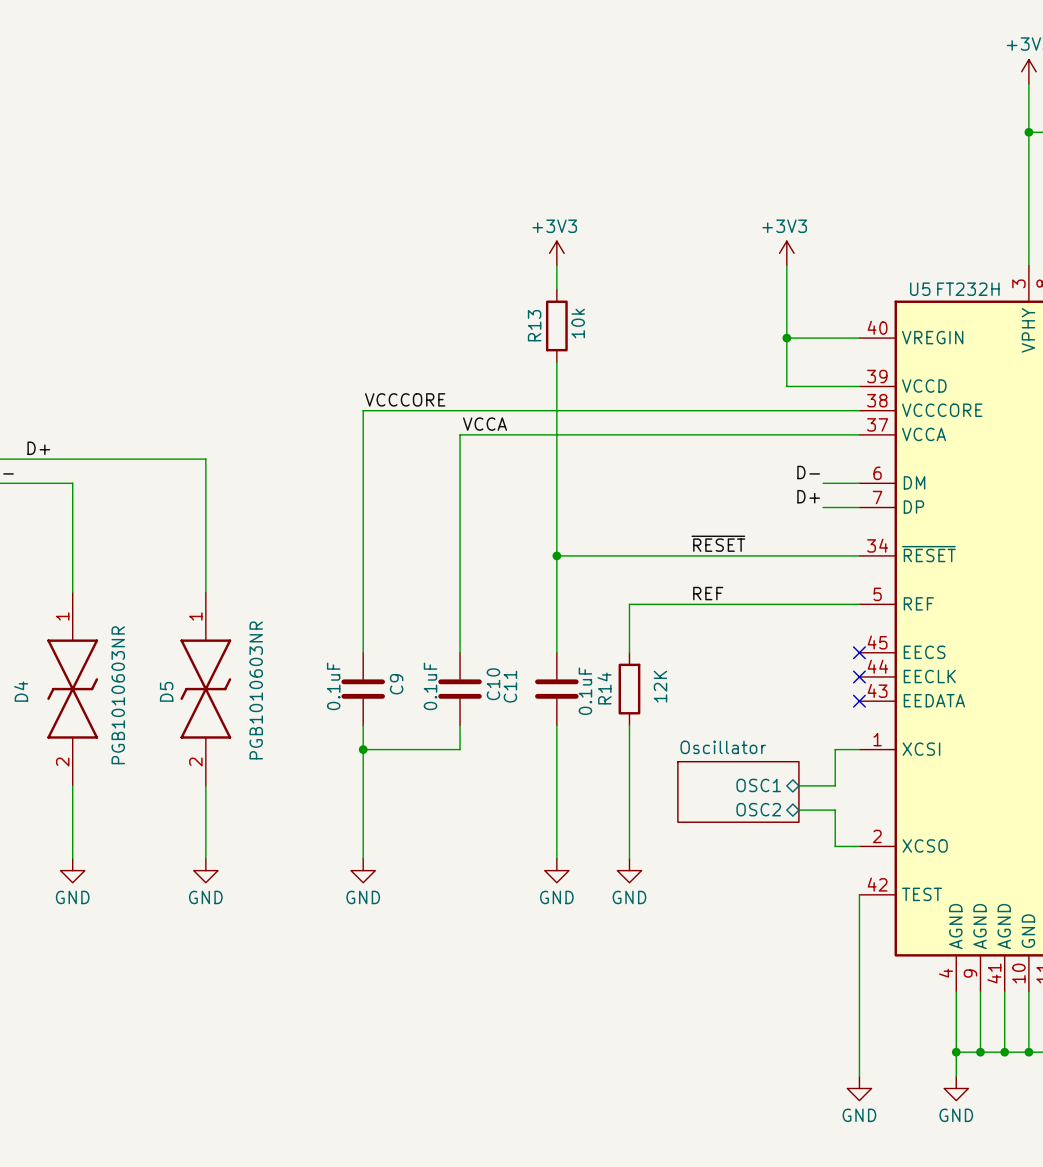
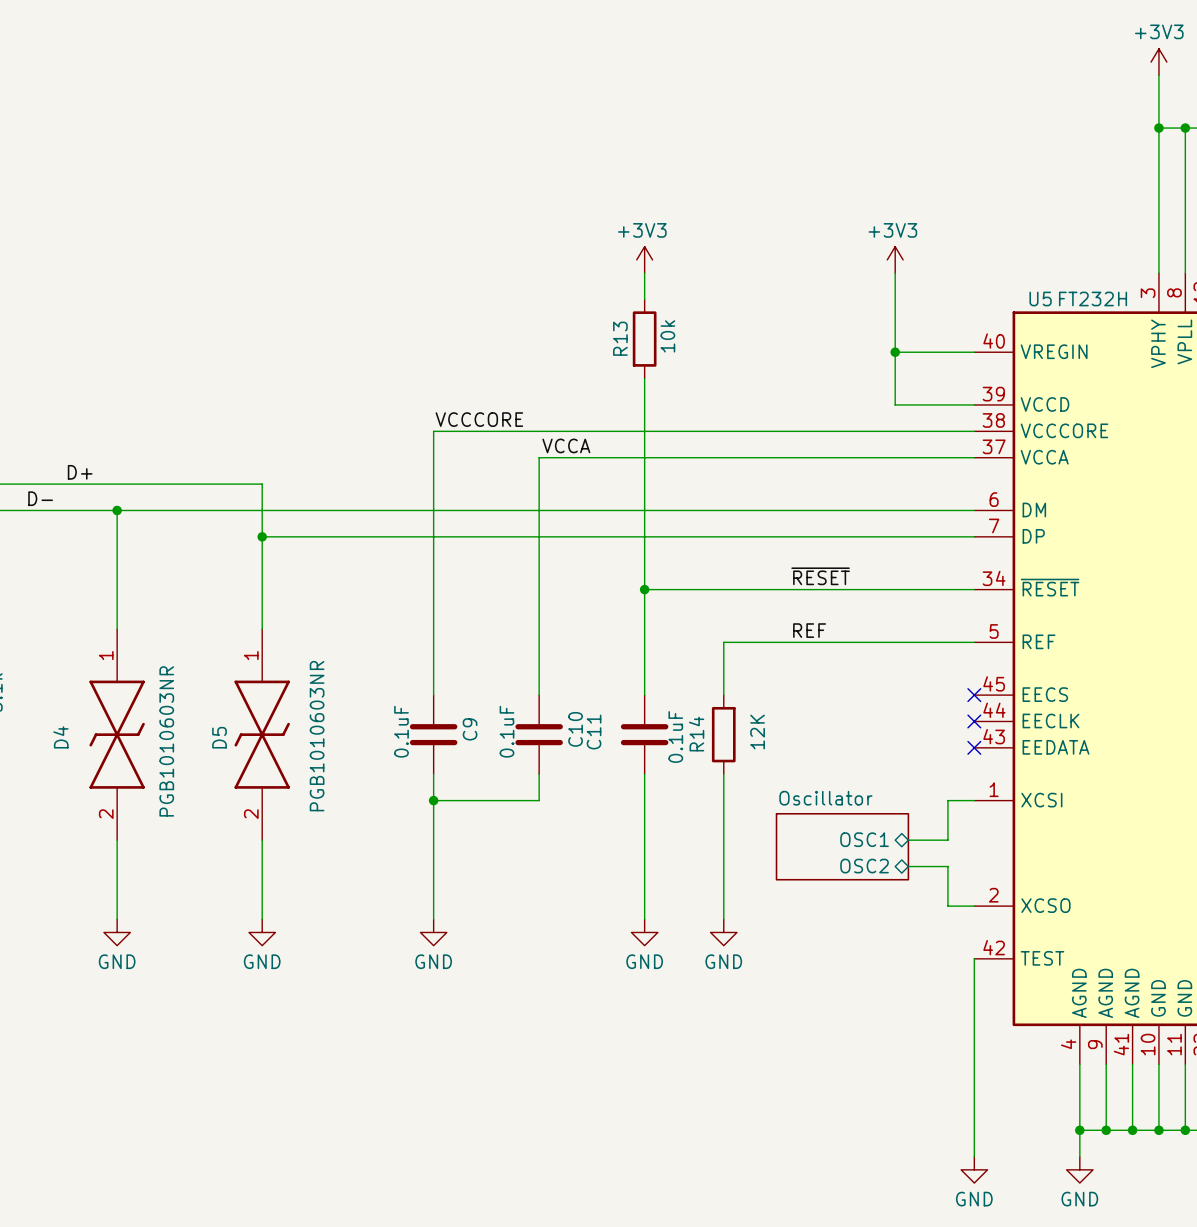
label: D- (808, 472) -> none
wire: none -> (117, 510) (934, 510)
junction: none -> (117, 510)
label: D+ (808, 496) -> none
wire: none -> (262, 536) (934, 536)
junction: none -> (262, 536)

